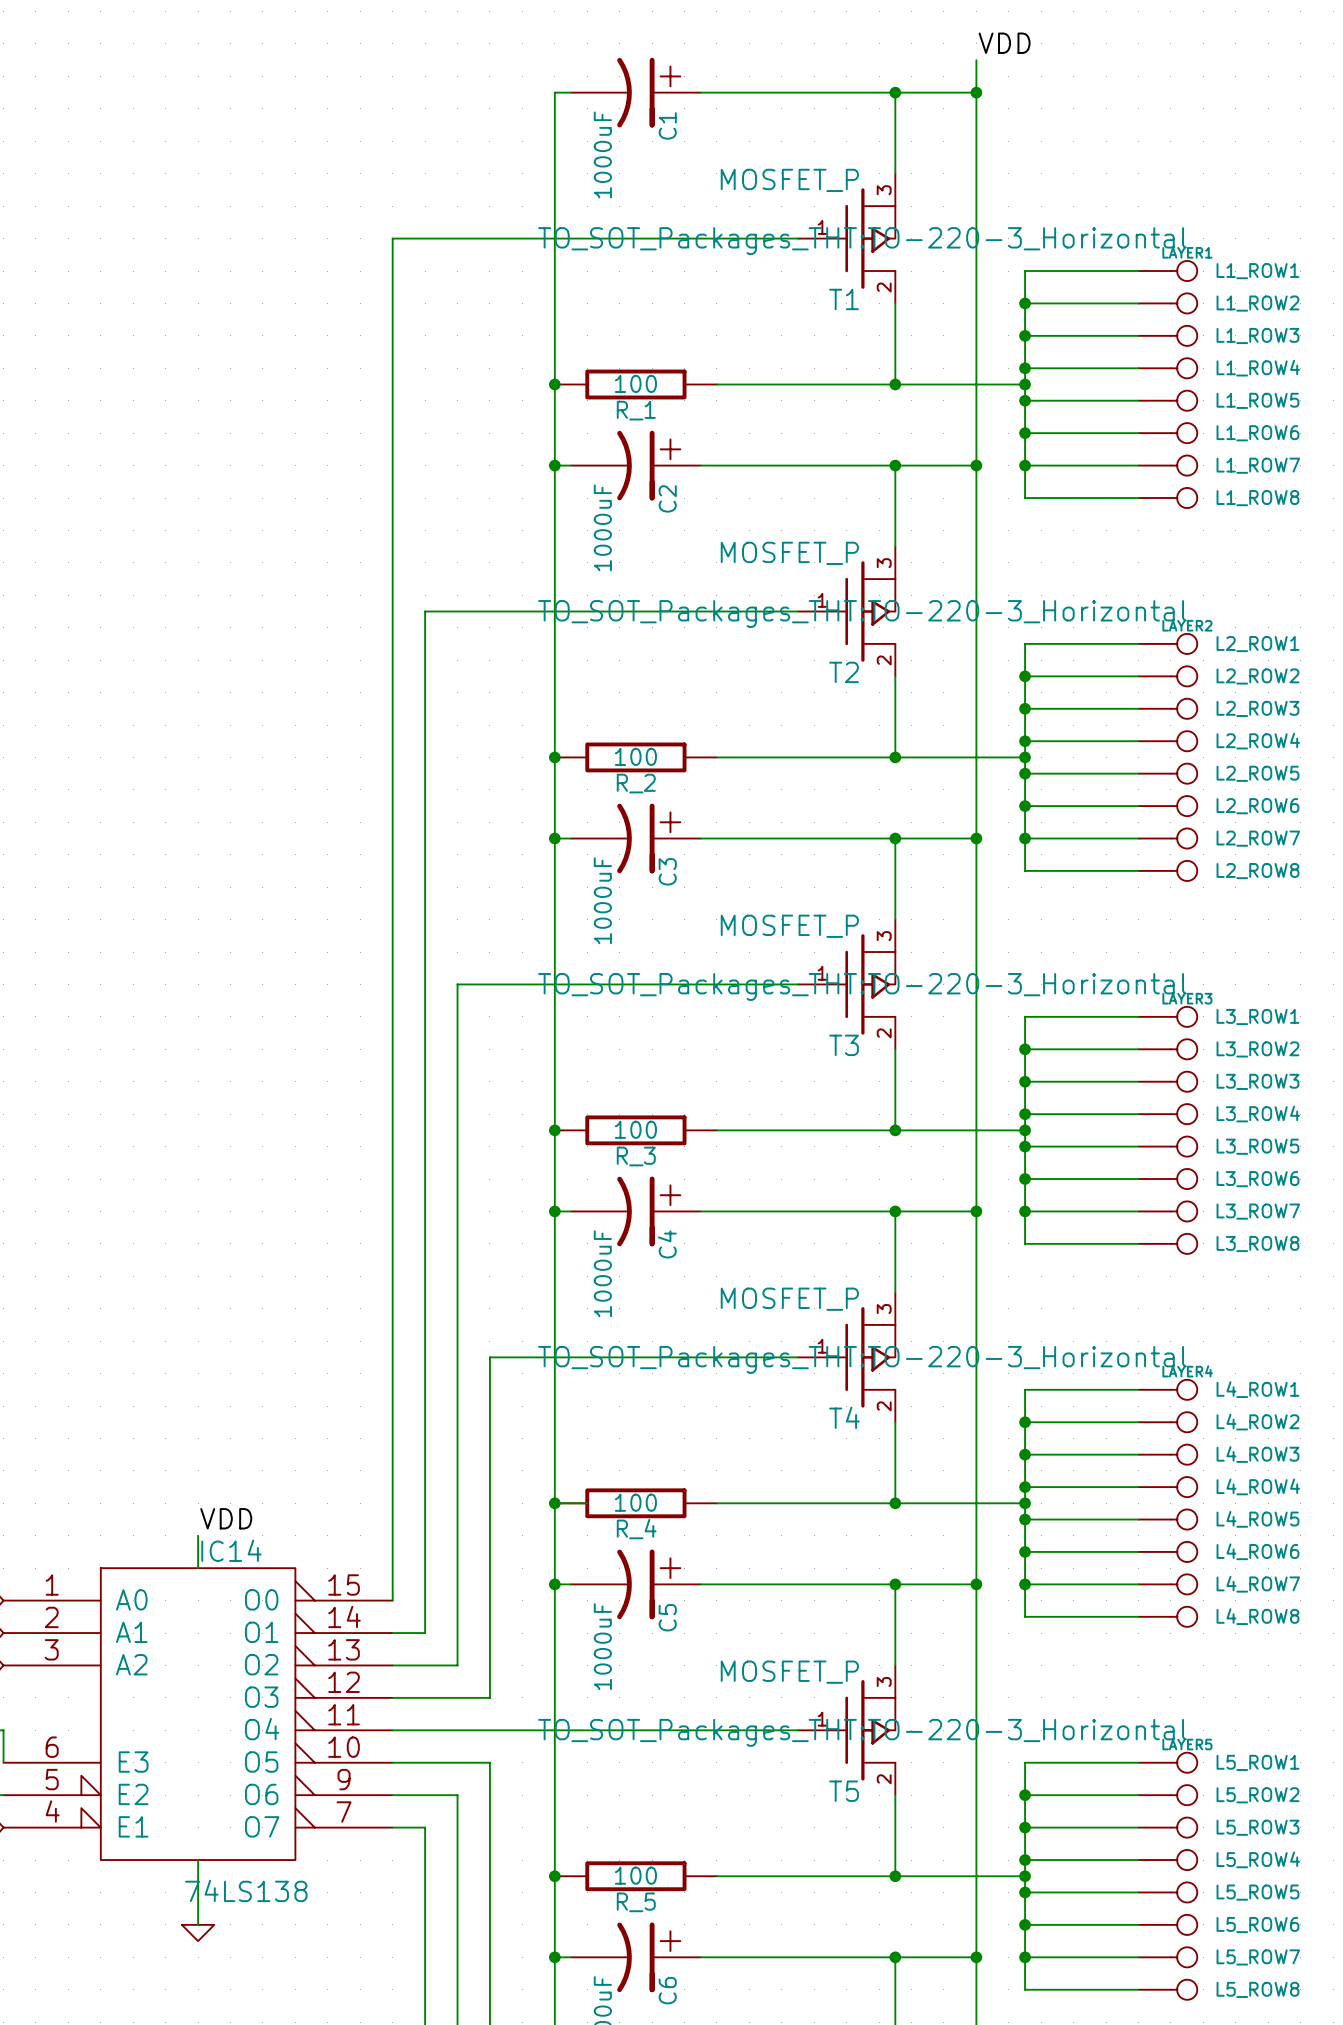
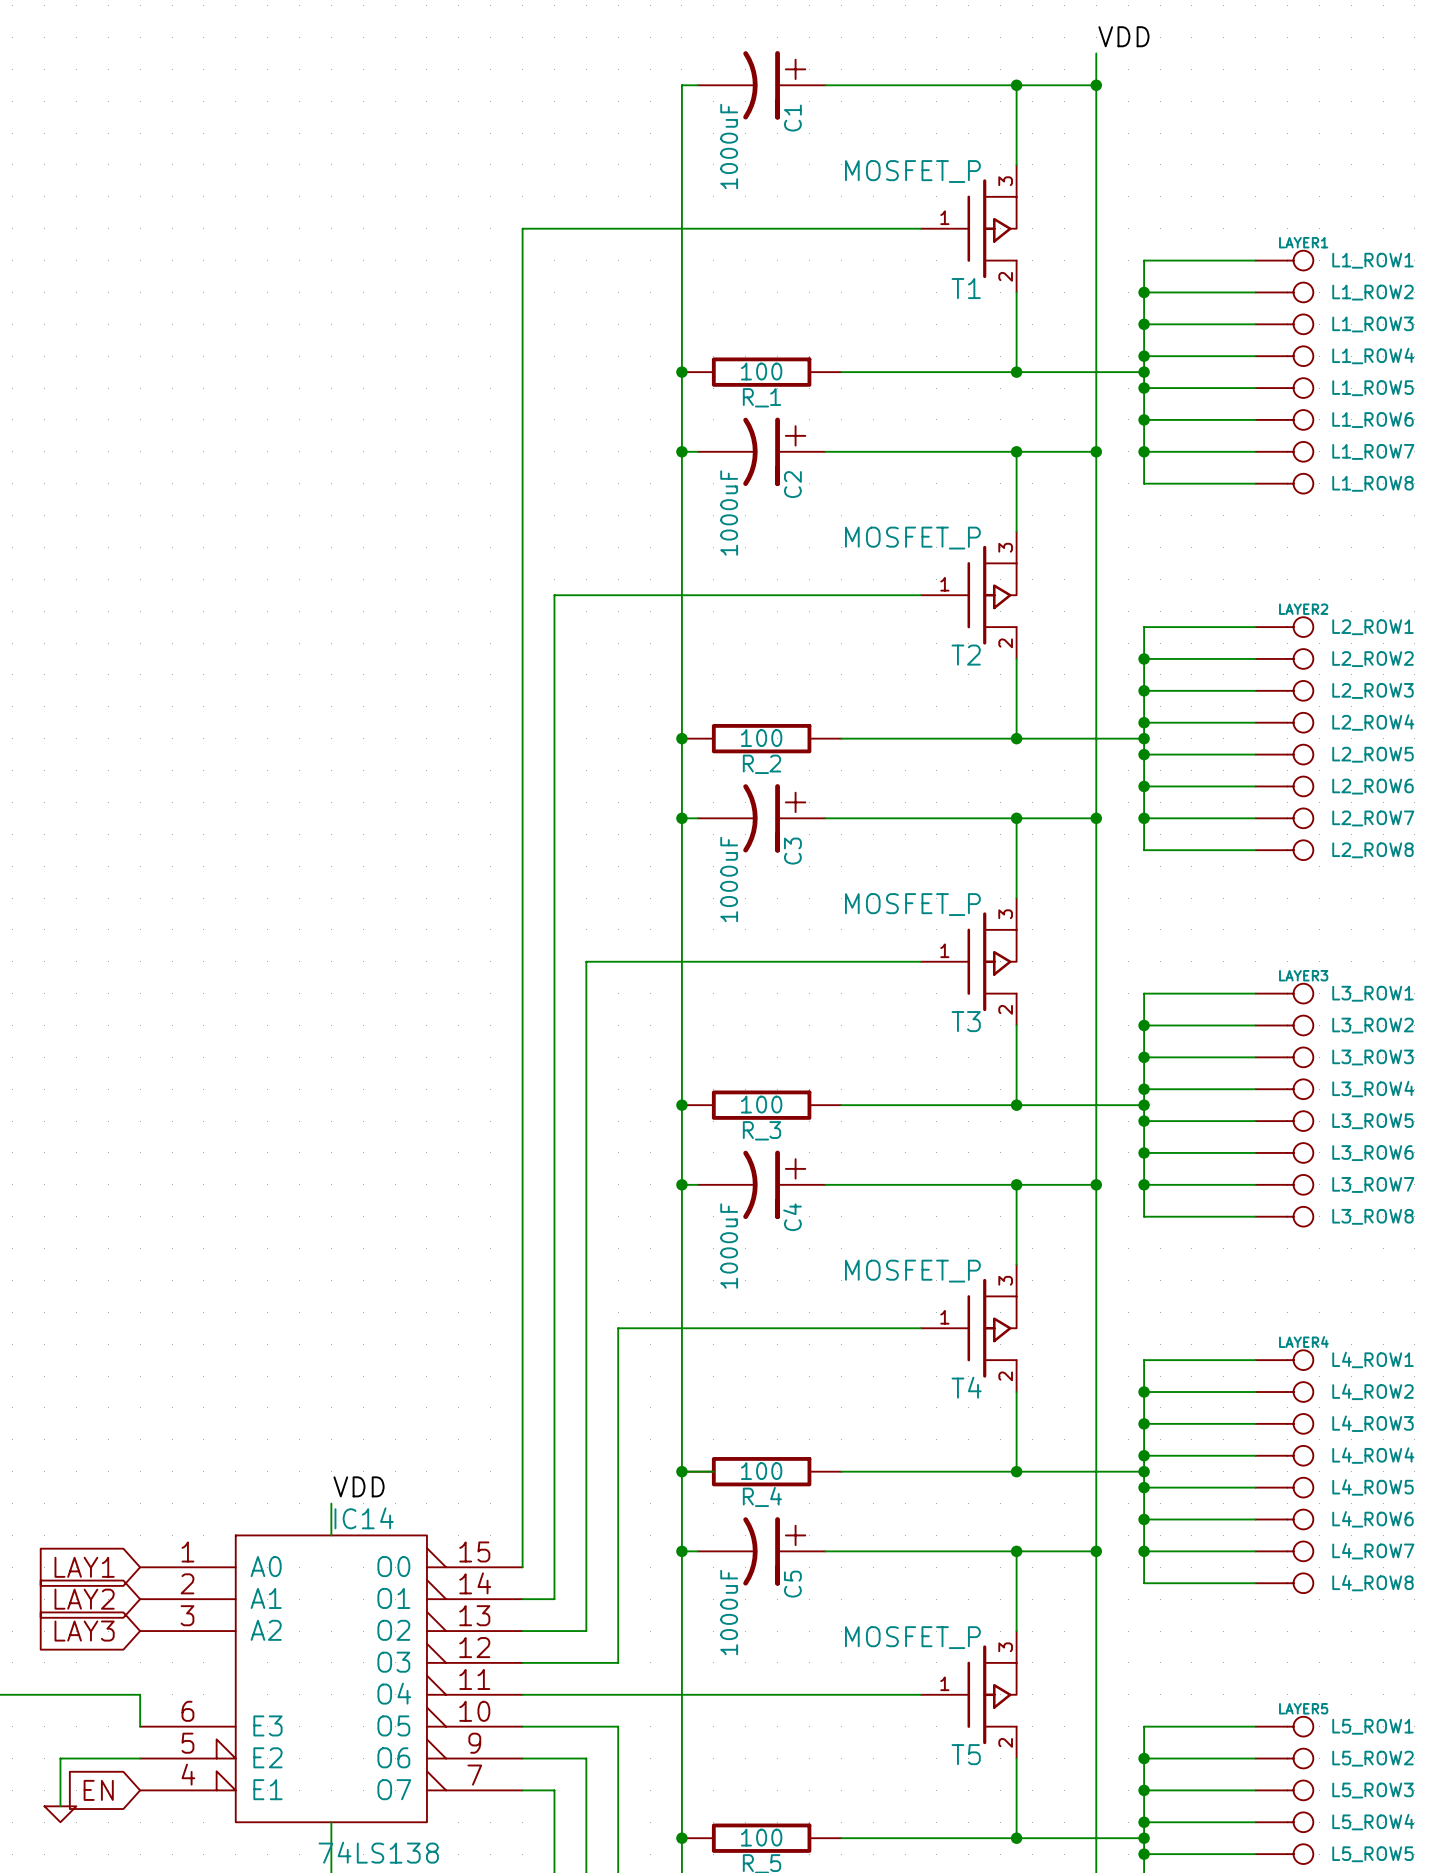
T1 text: TO_SOT_Packages_THT:TO-220-3_Horizontal (862, 241) -> none
T2 text: TO_SOT_Packages_THT:TO-220-3_Horizontal (862, 614) -> none
T3 text: TO_SOT_Packages_THT:TO-220-3_Horizontal (862, 986) -> none
T4 text: TO_SOT_Packages_THT:TO-220-3_Horizontal (862, 1359) -> none
T5 text: TO_SOT_Packages_THT:TO-220-3_Horizontal (862, 1732) -> none

